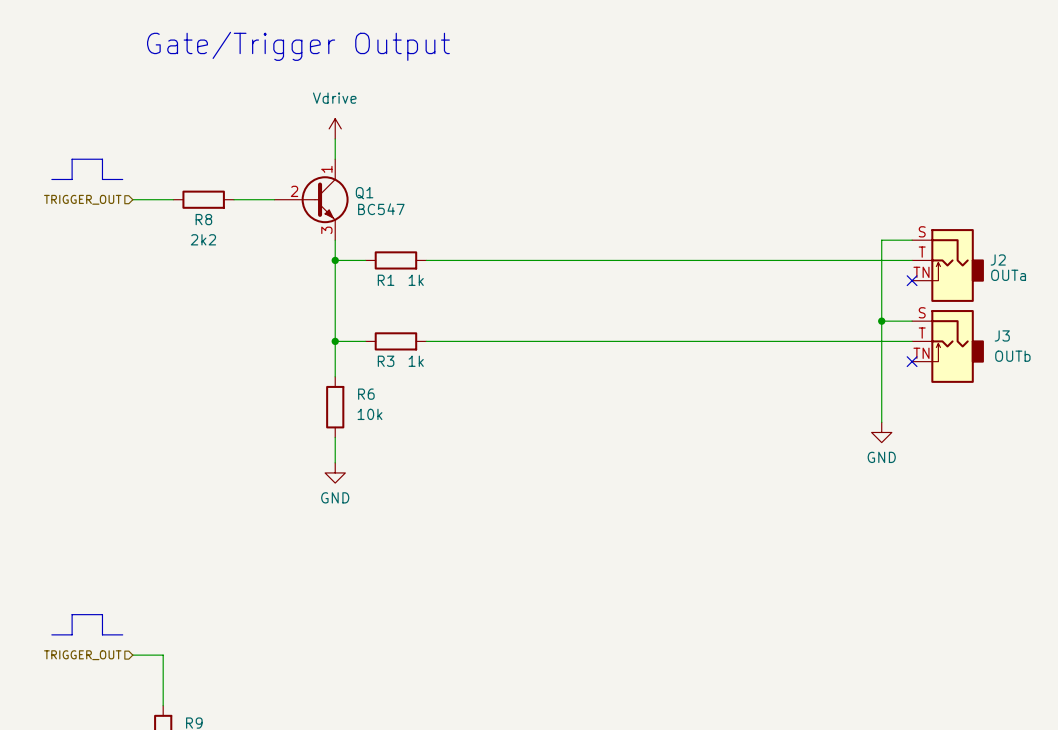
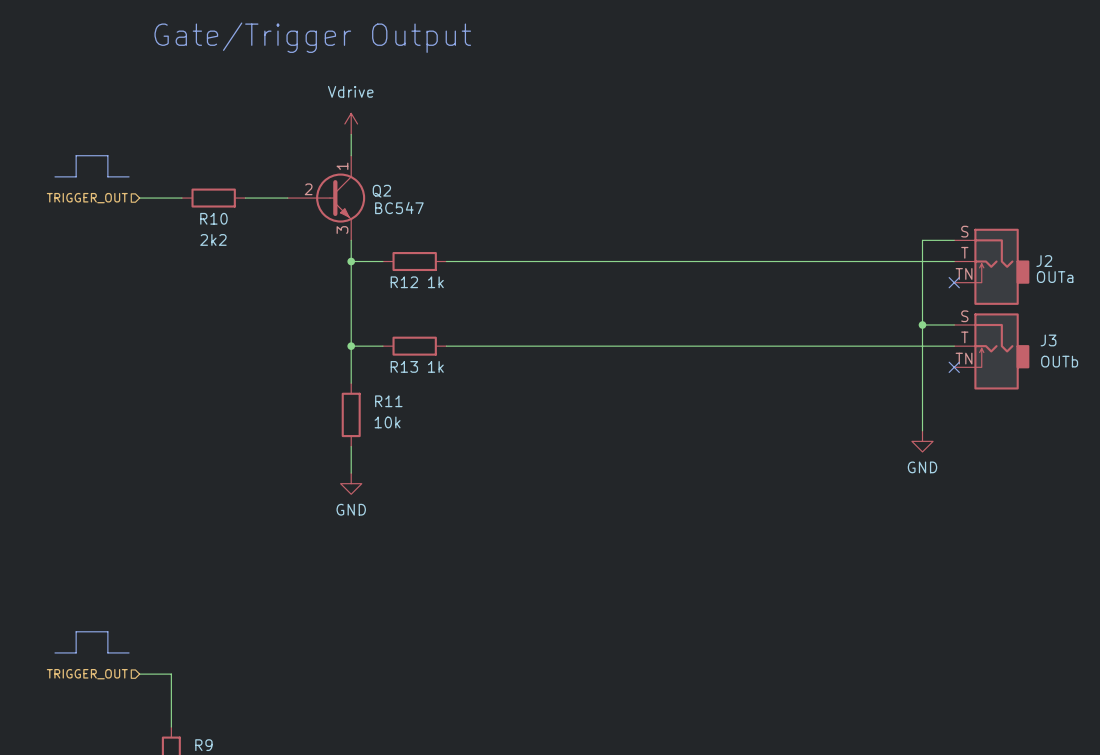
Q1 name: Q1 (364, 193) -> Q2 (381, 191)
R8 name: R8 (203, 219) -> R10 (213, 218)
R1 name: R1 (386, 280) -> R12 (404, 282)
R3 name: R3 (386, 361) -> R13 (404, 366)
R6 name: R6 (366, 394) -> R11 (388, 401)

